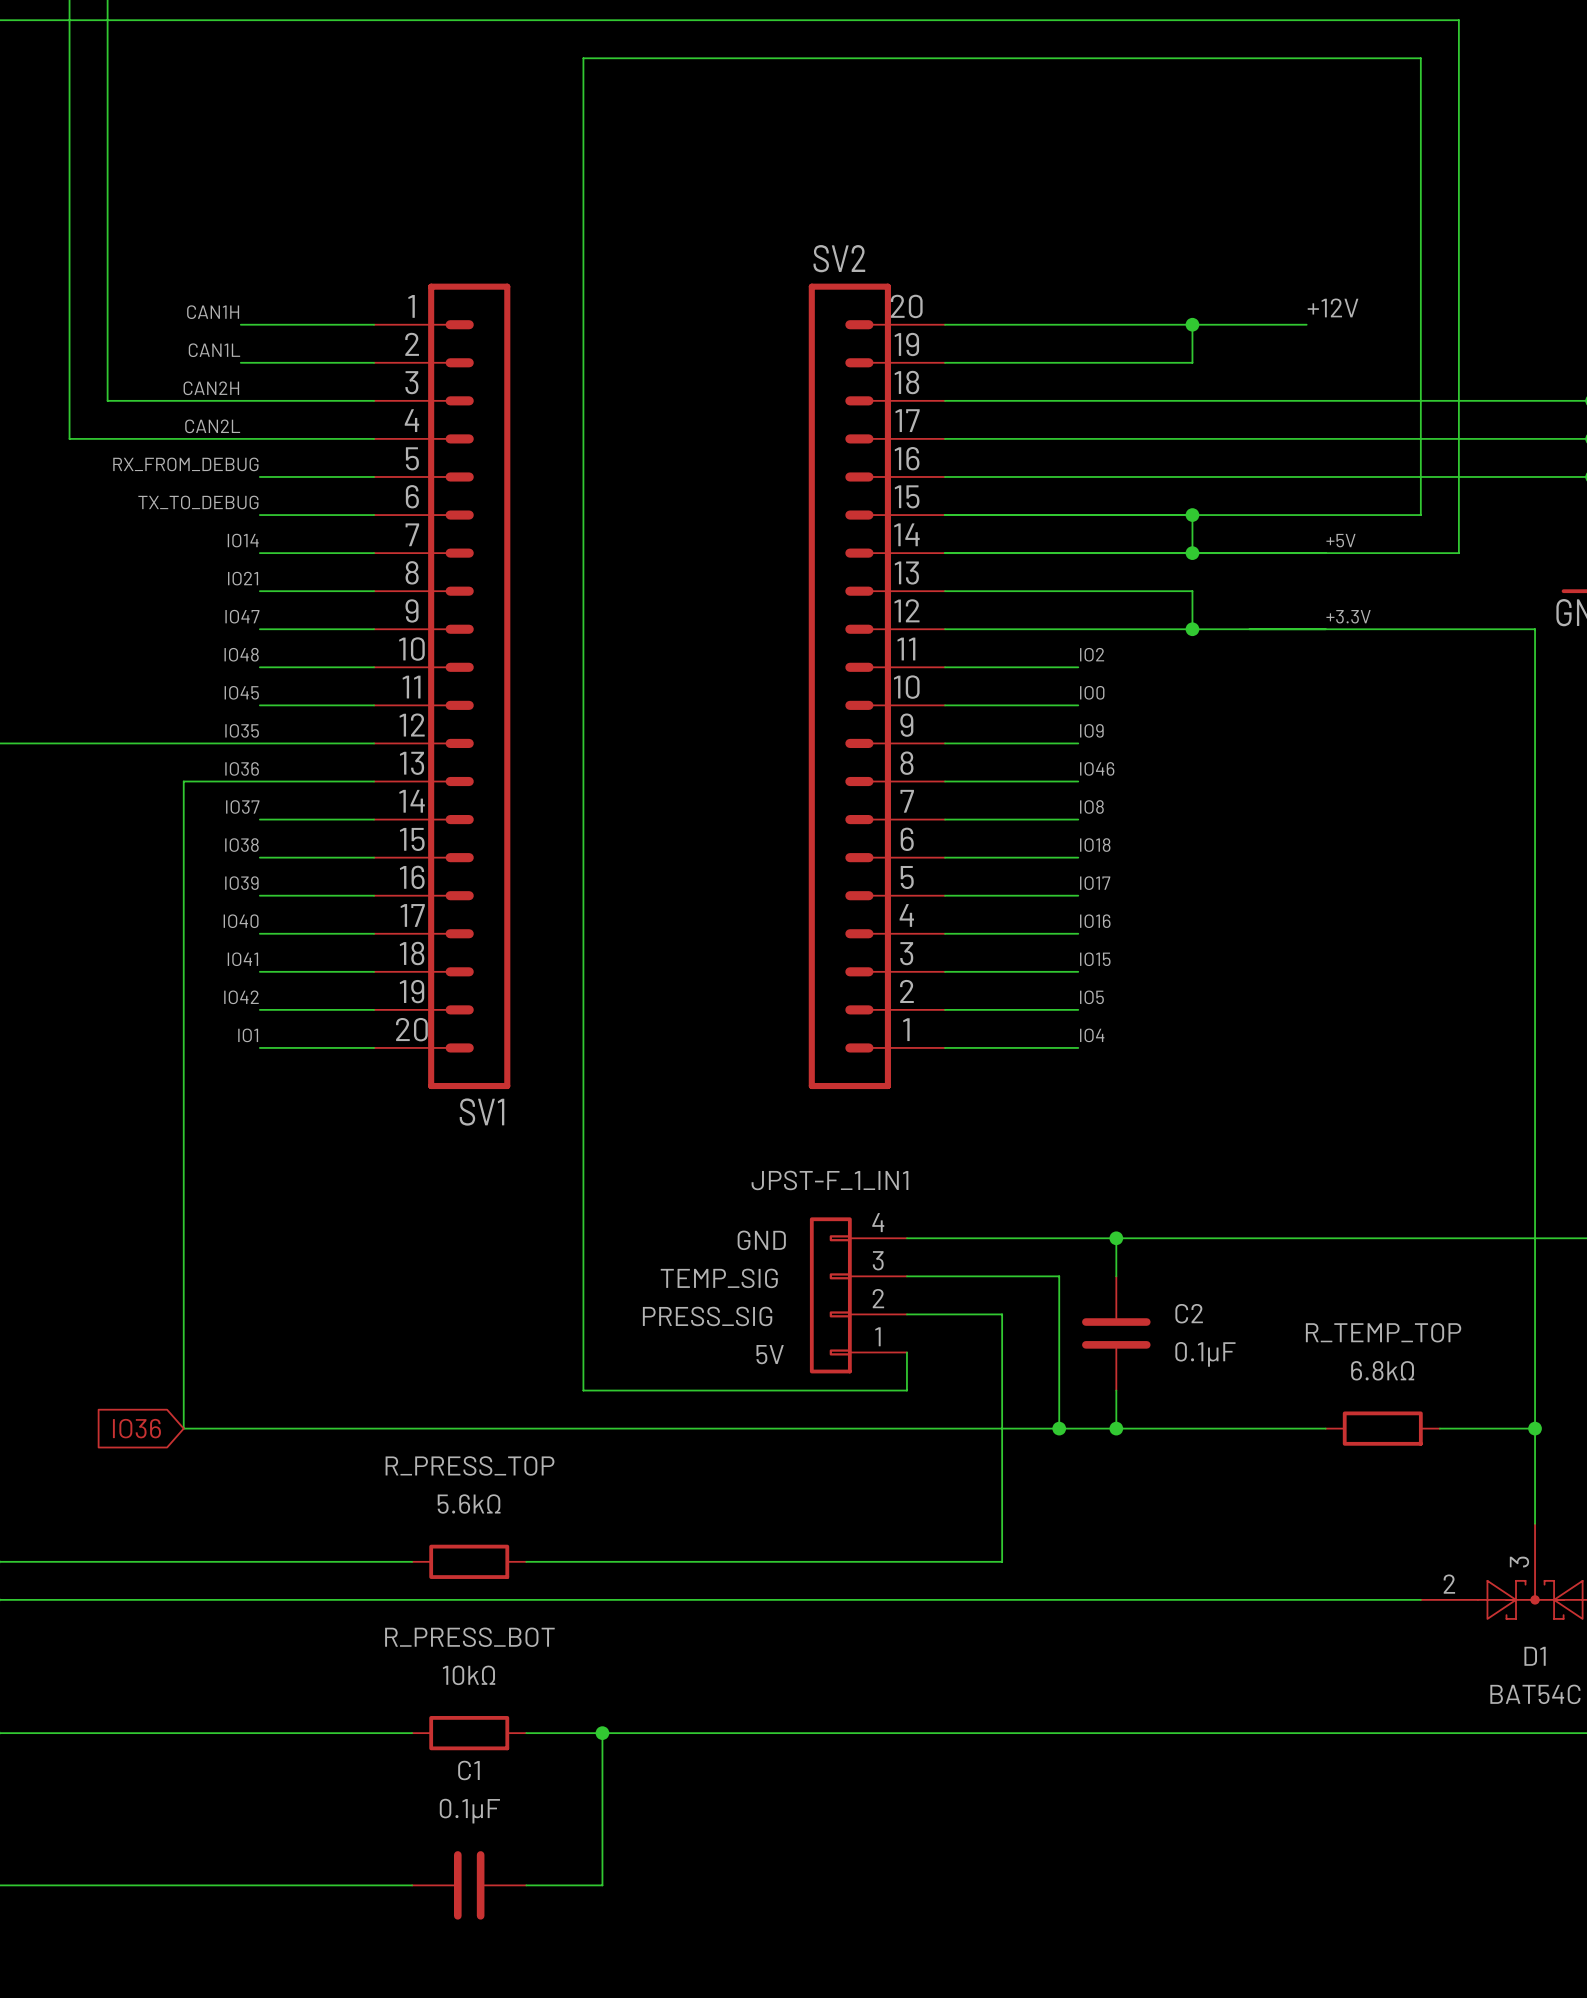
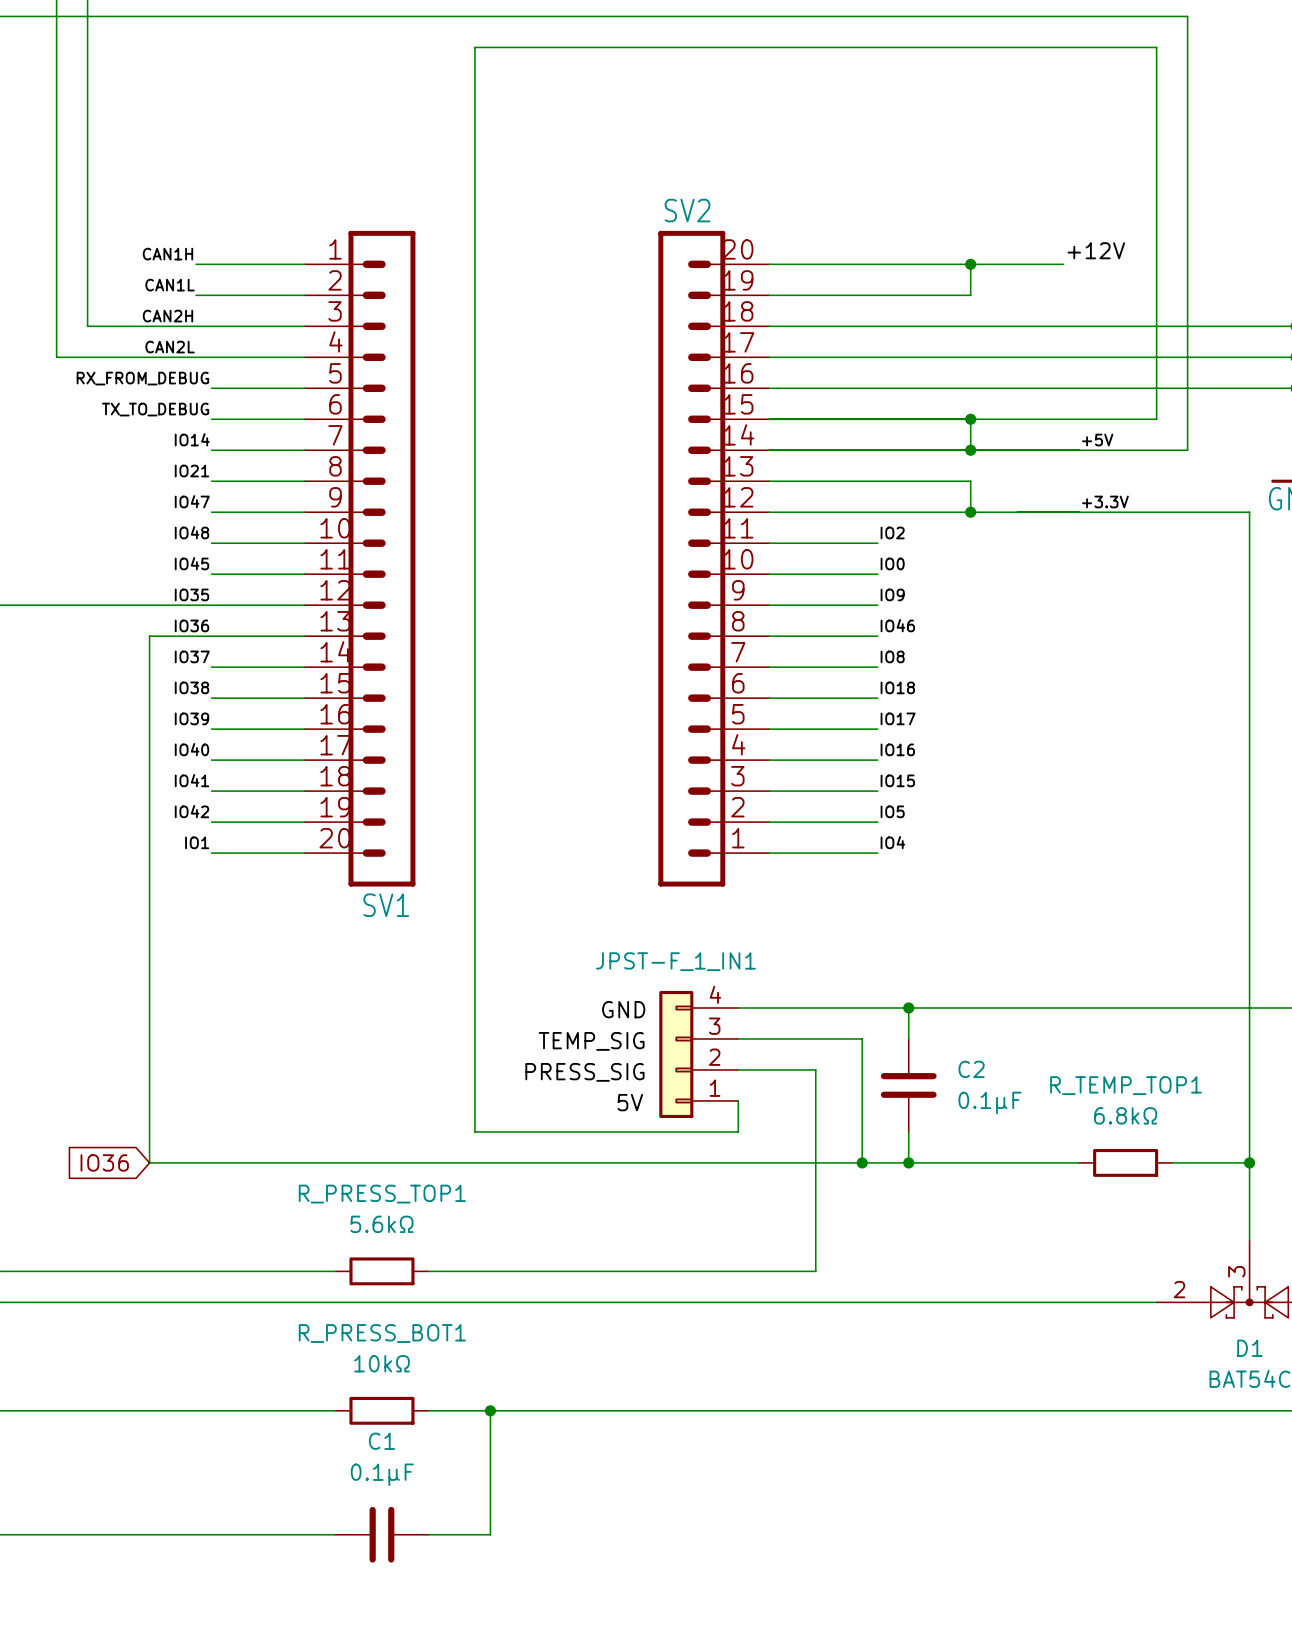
R_TEMP_TOP name: R_TEMP_TOP (1383, 1332) -> R_TEMP_TOP1 (1125, 1085)
R_PRESS_TOP name: R_PRESS_TOP (470, 1465) -> R_PRESS_TOP1 (382, 1194)
R_PRESS_BOT name: R_PRESS_BOT (469, 1637) -> R_PRESS_BOT1 (382, 1333)

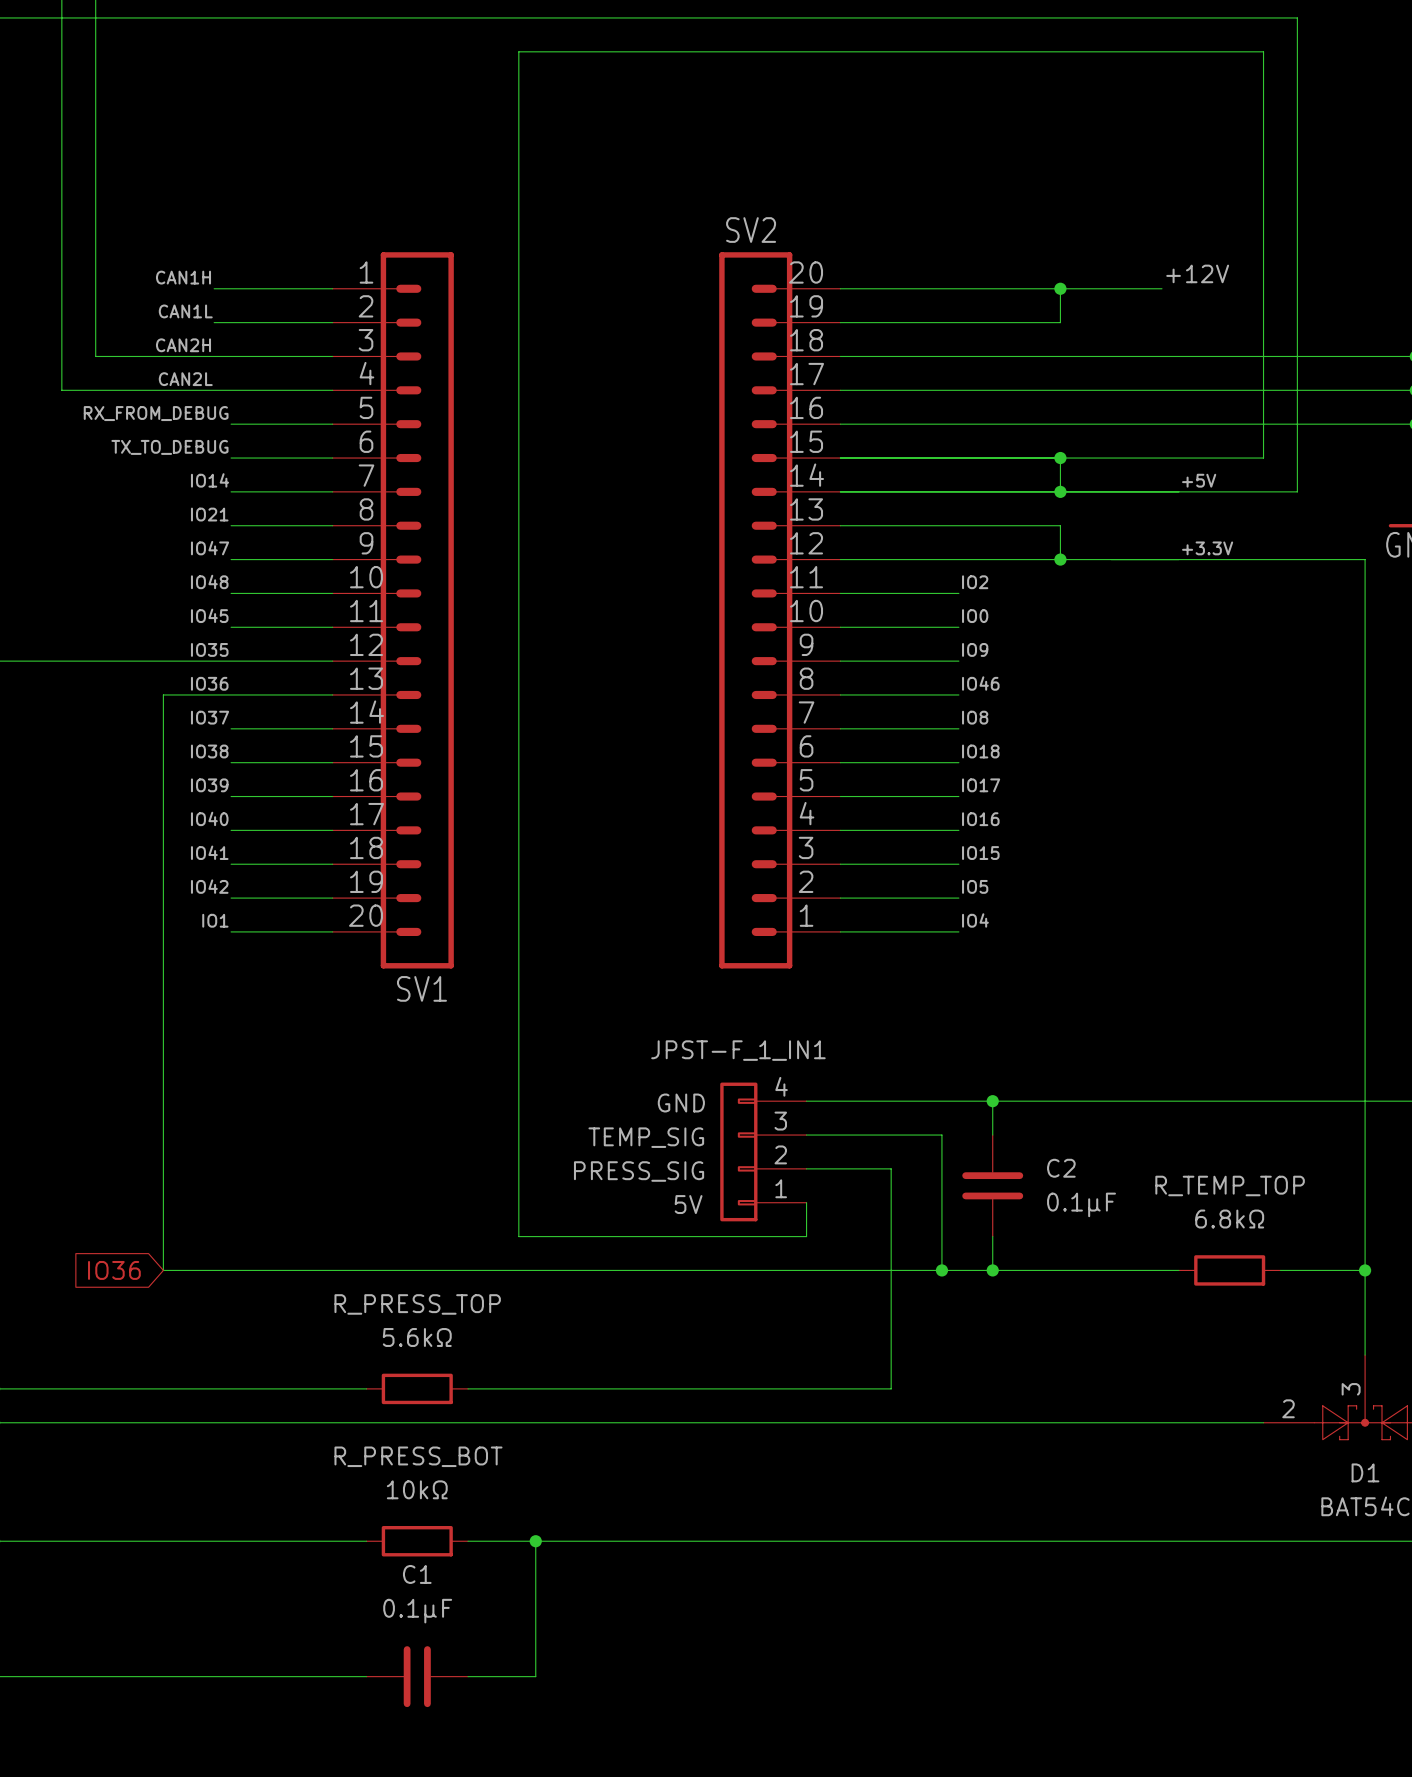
R_TEMP_TOP1 name: R_TEMP_TOP1 (1125, 1085) -> R_TEMP_TOP (1230, 1185)
R_PRESS_TOP1 name: R_PRESS_TOP1 (382, 1194) -> R_PRESS_TOP (417, 1304)
R_PRESS_BOT1 name: R_PRESS_BOT1 (382, 1333) -> R_PRESS_BOT (418, 1456)

